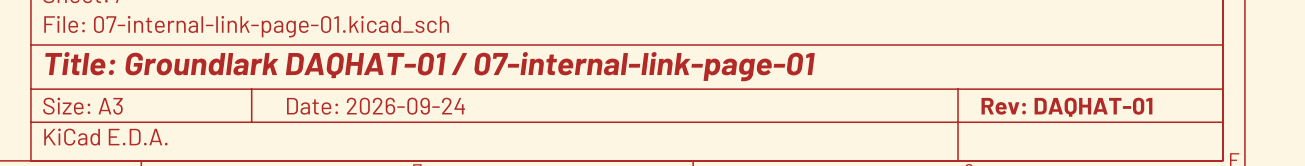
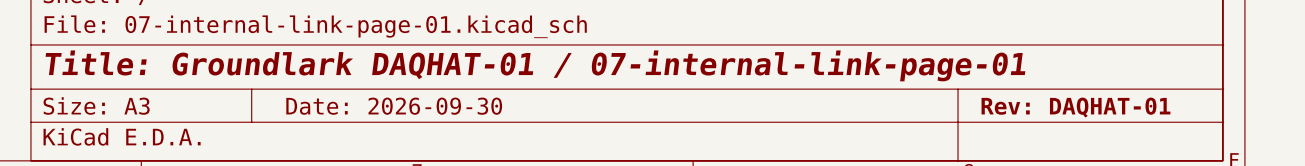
title block: Date: 2026-09-24 (375, 106) -> Date: 2026-09-30 (394, 106)

